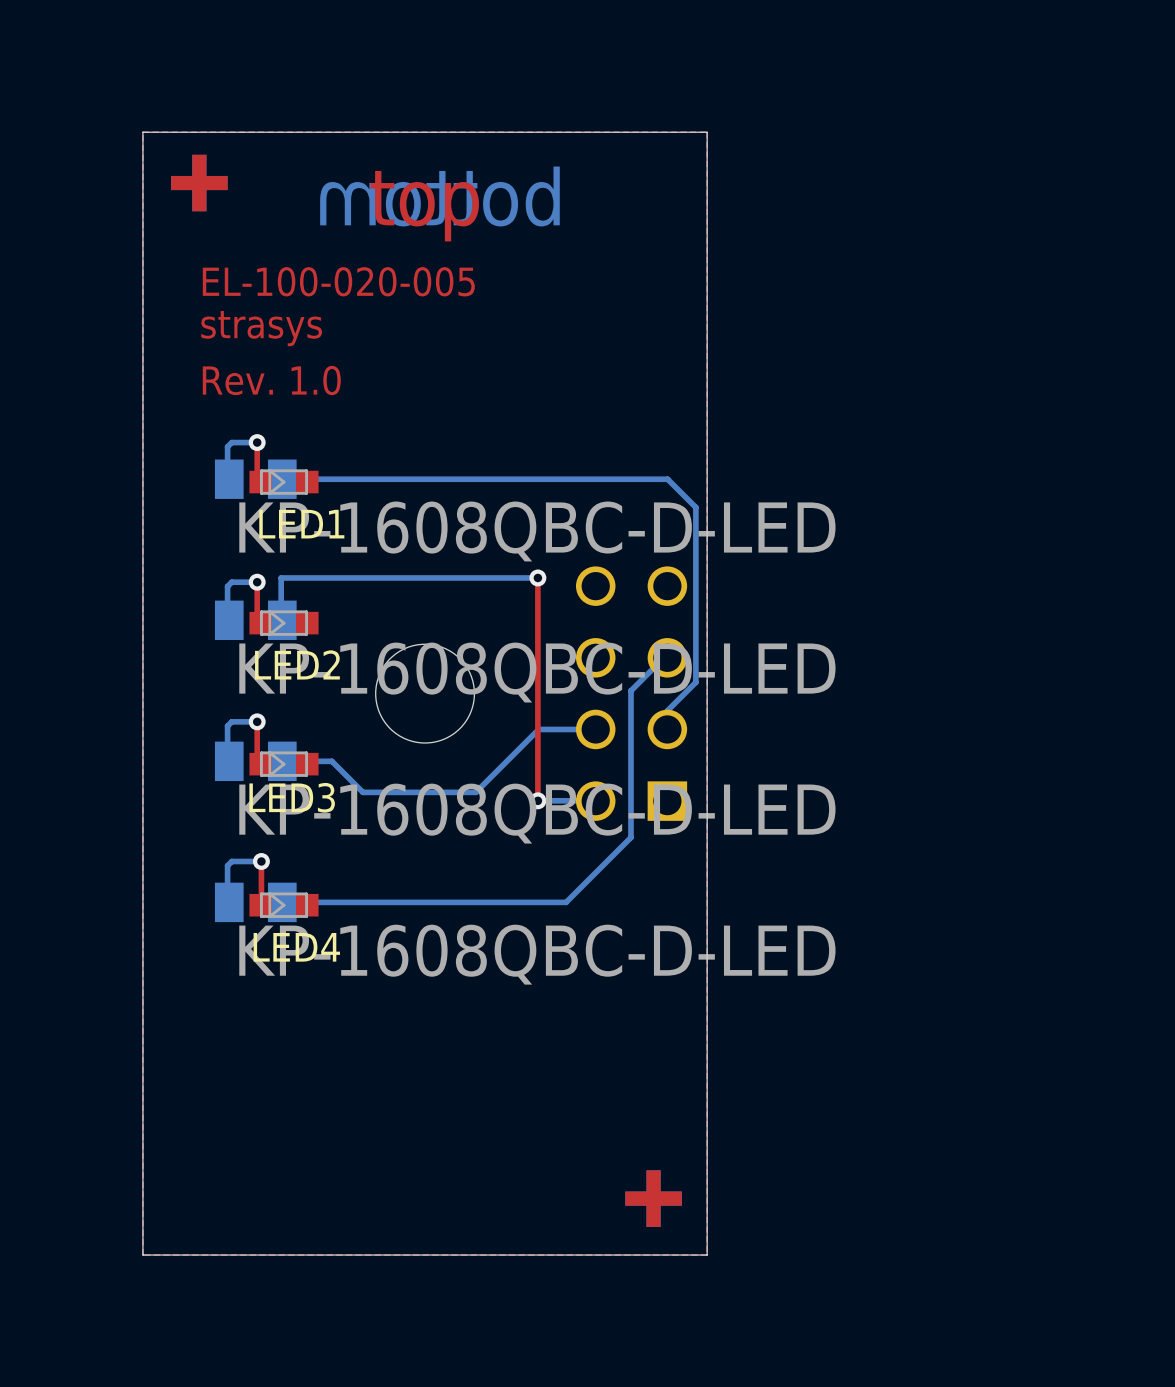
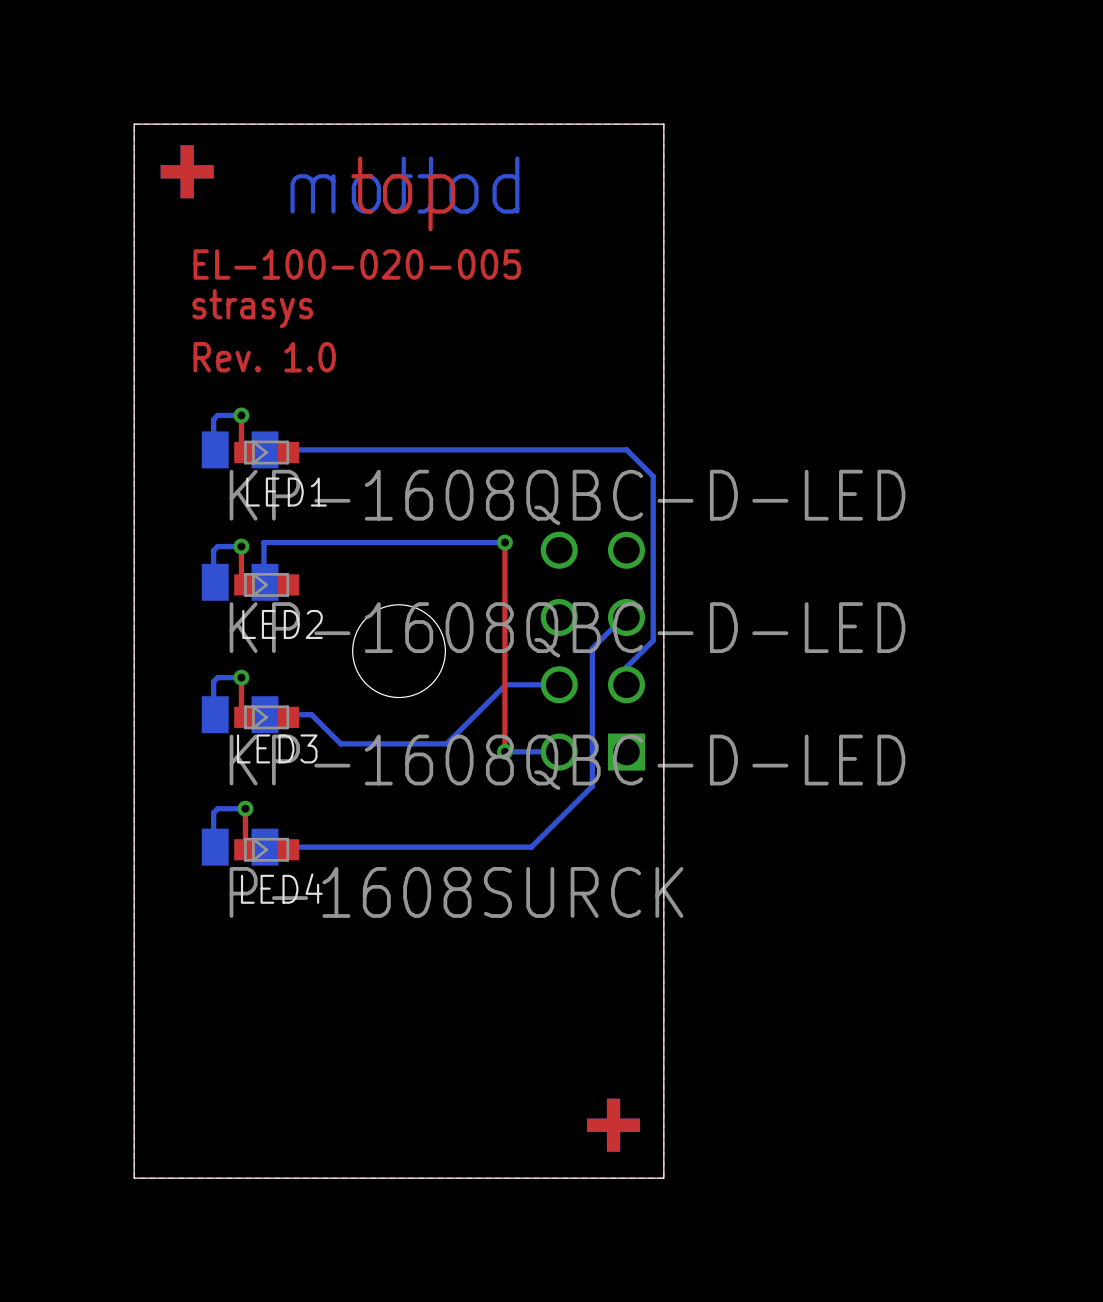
LED4 value: KP-1608QBC-D-LED (537, 954) -> P-1608SURCK (456, 892)

